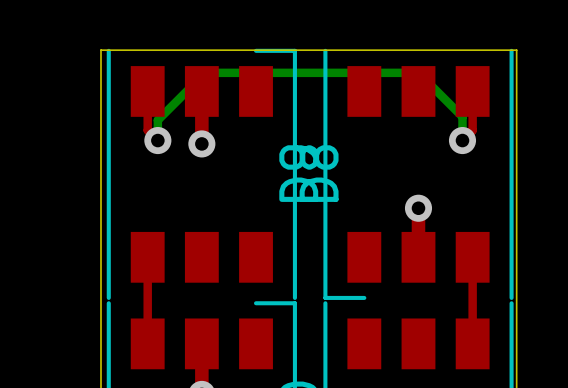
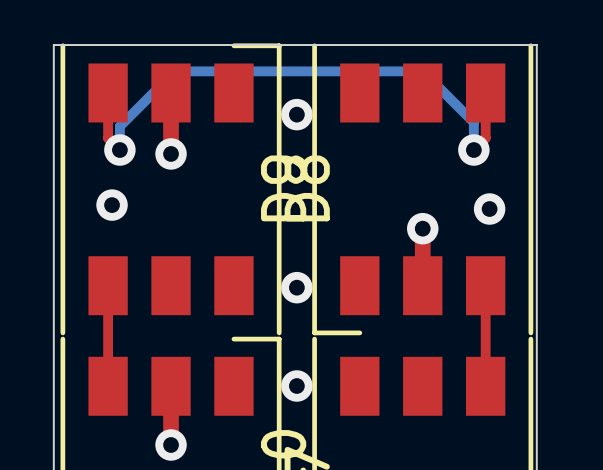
via: none -> (296, 114)
via: none -> (112, 205)
via: none -> (489, 209)
via: none -> (296, 287)
via: none -> (296, 386)

